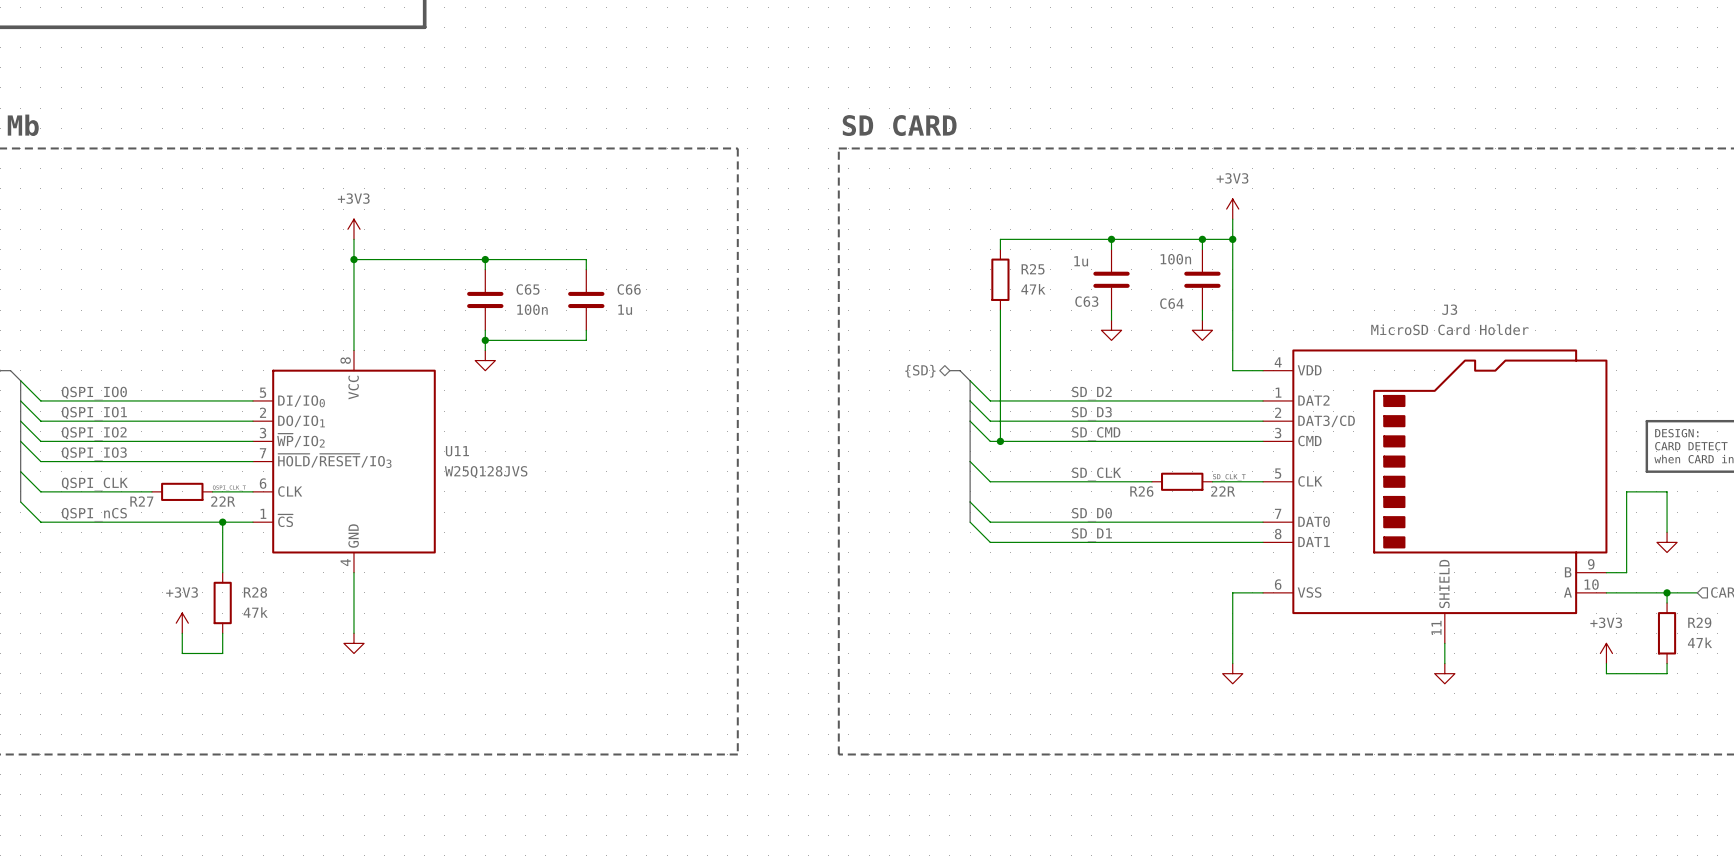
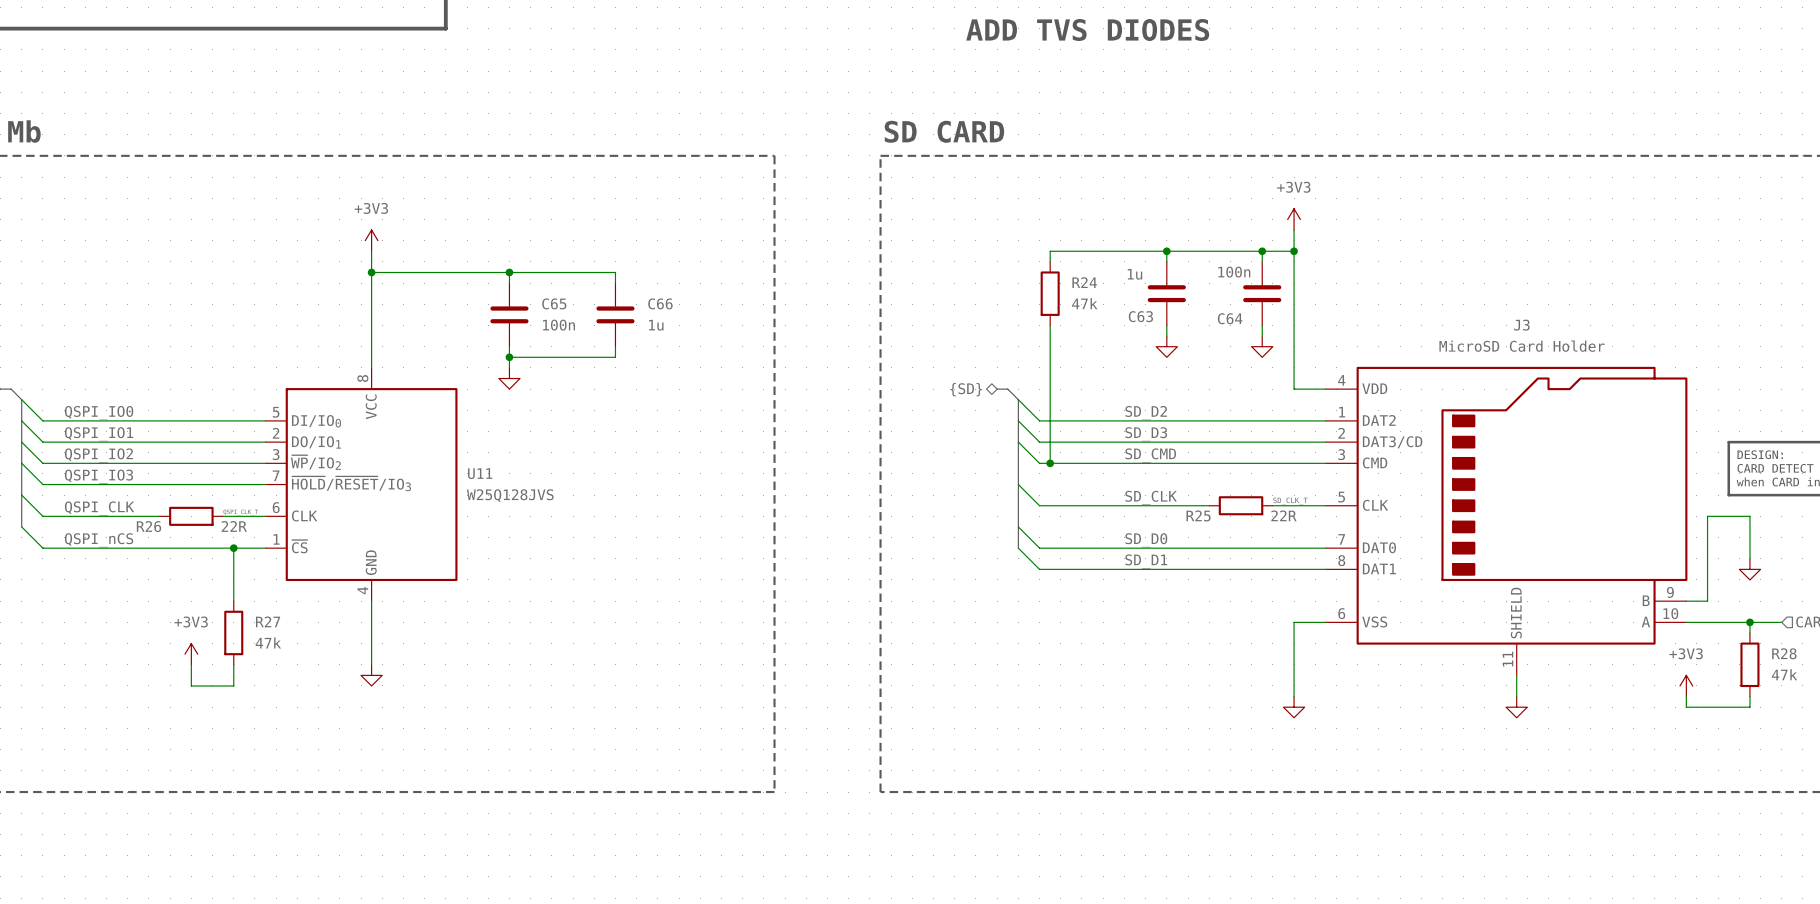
text: none -> ADD TVS DIODES (1087, 29)
R25 name: R25 (1033, 269) -> R24 (1084, 282)
R26 name: R26 (1141, 491) -> R25 (1198, 515)
R27 name: R27 (141, 501) -> R26 (148, 526)
R28 name: R28 (255, 592) -> R27 (268, 621)
R29 name: R29 (1699, 622) -> R28 (1784, 653)

